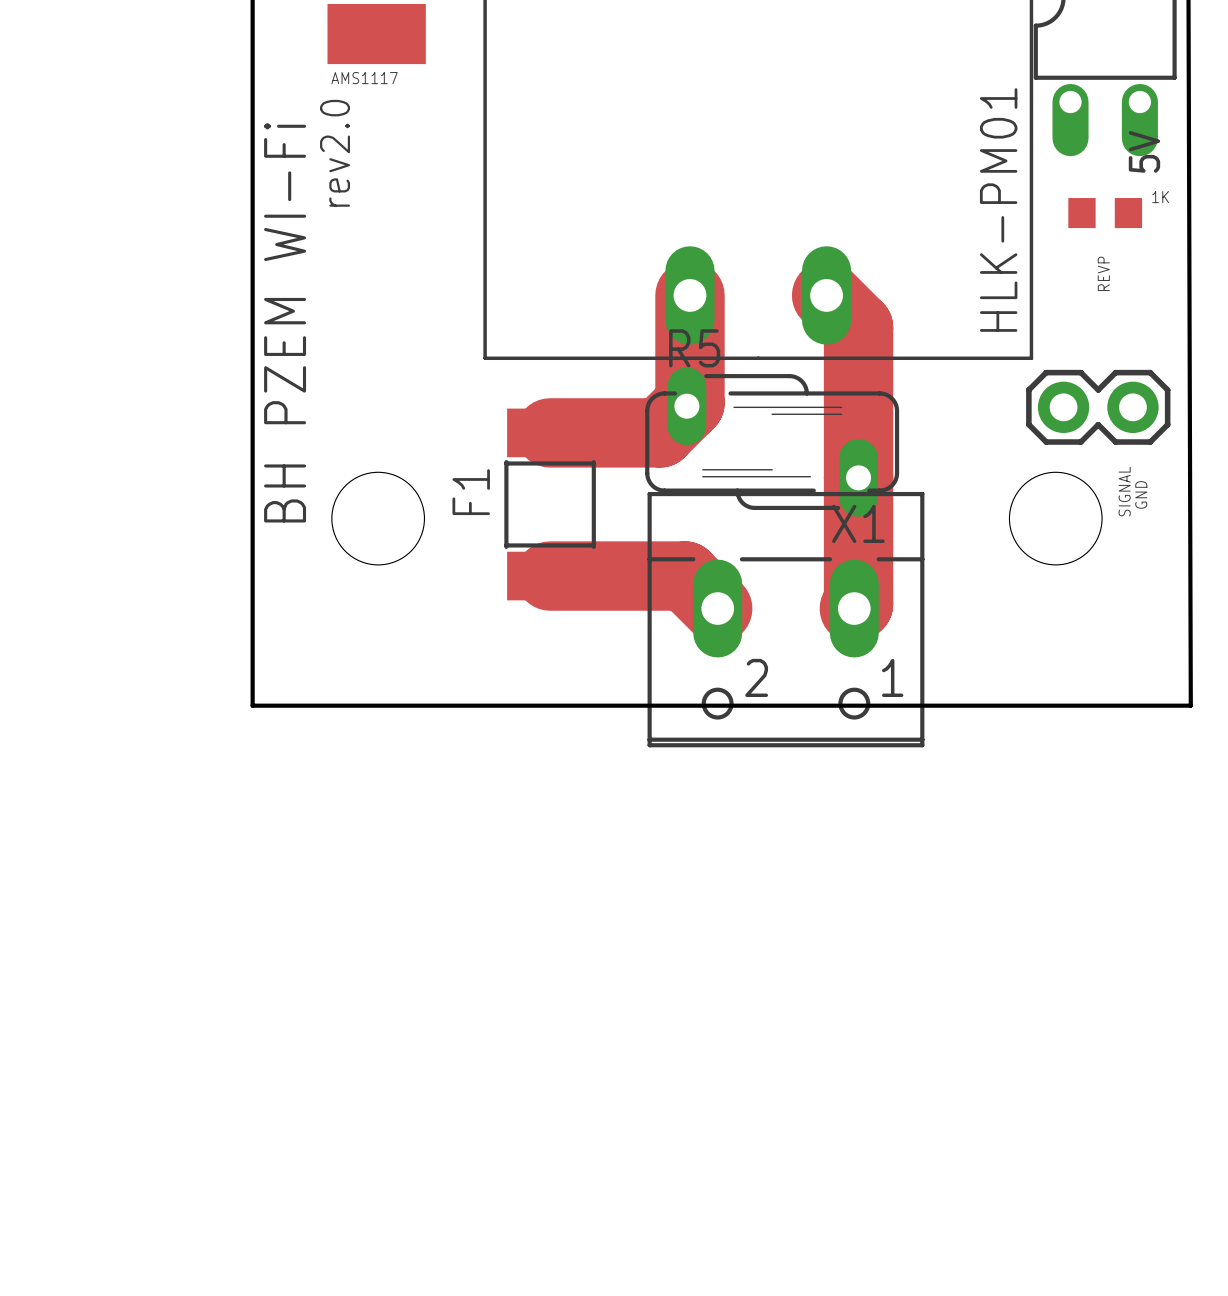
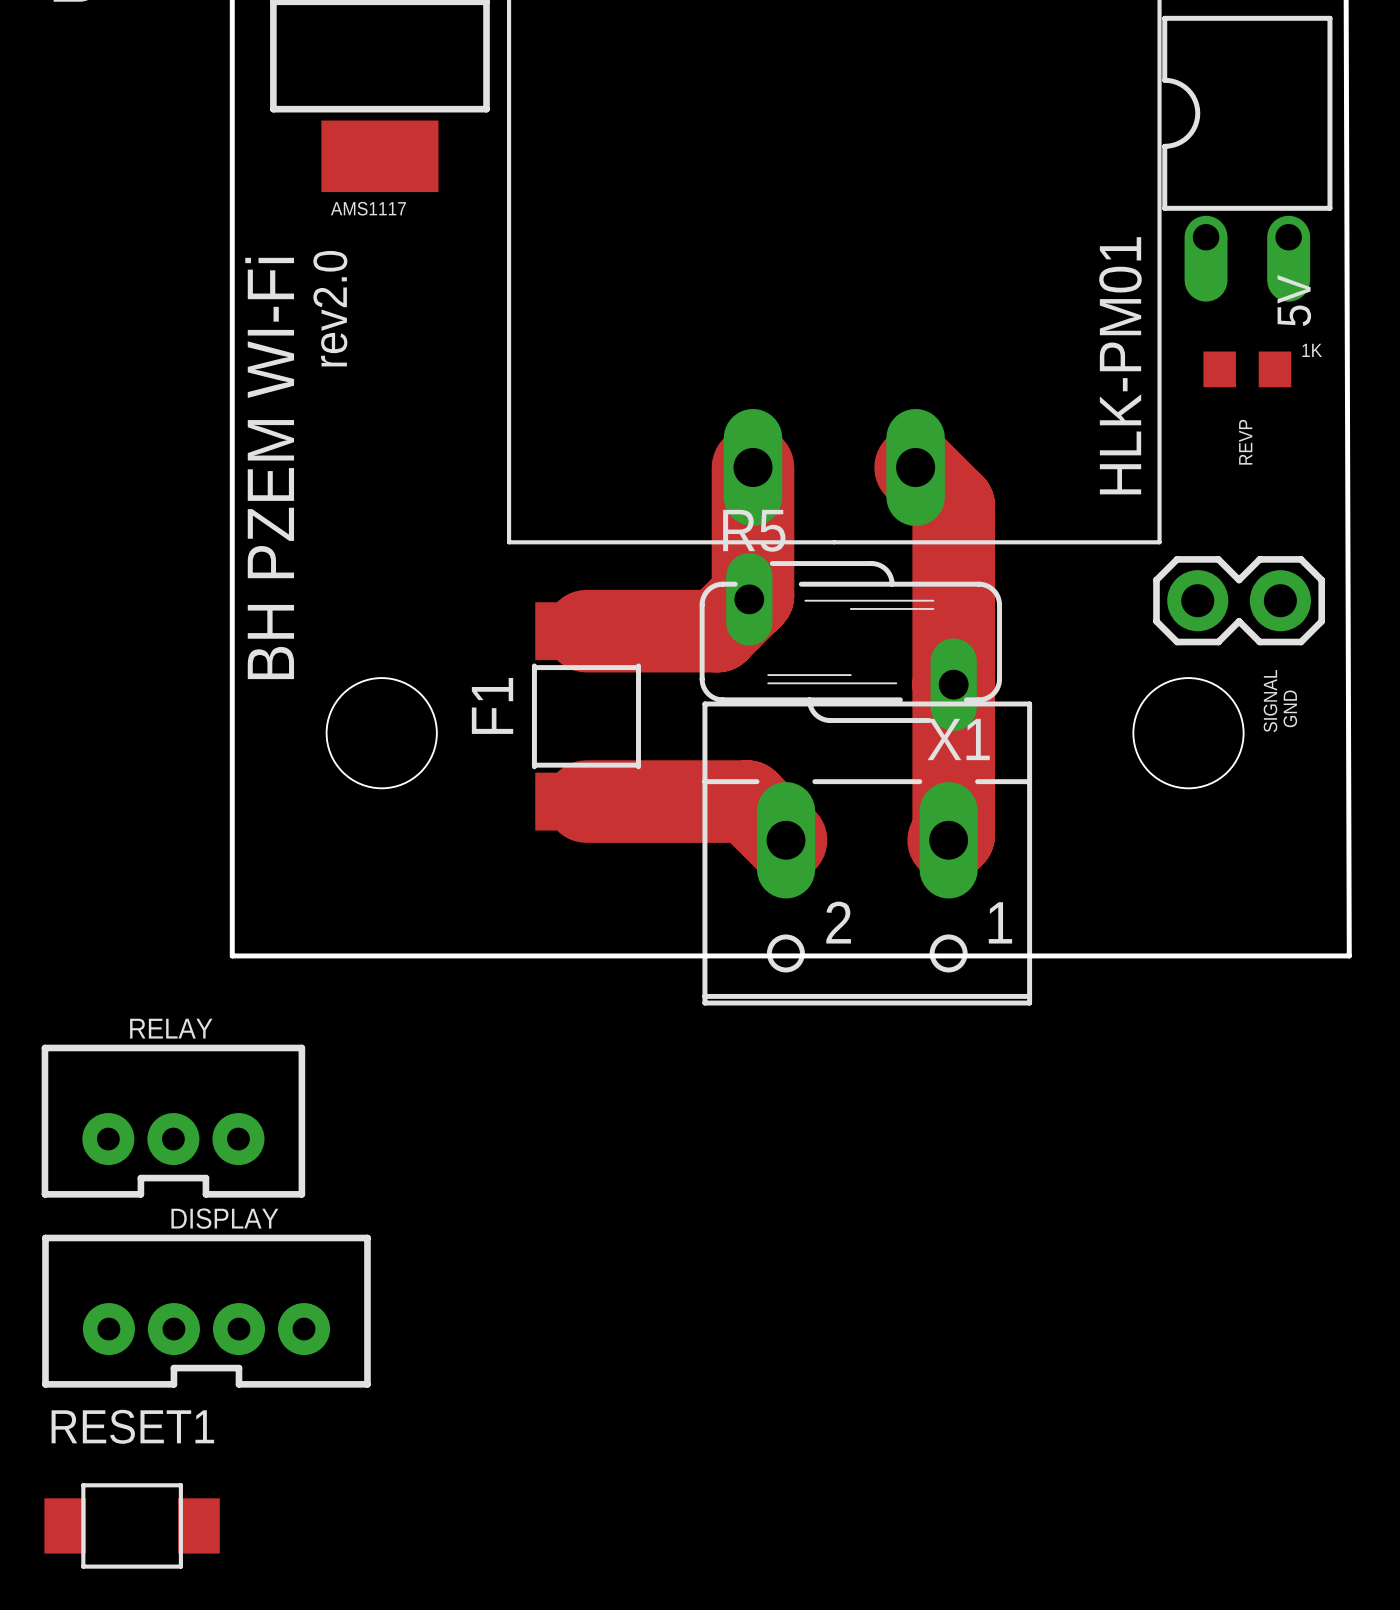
RELAY: none -> (173, 1121)
DISPLAY: none -> (206, 1311)
RESET1: none -> (132, 1525)

